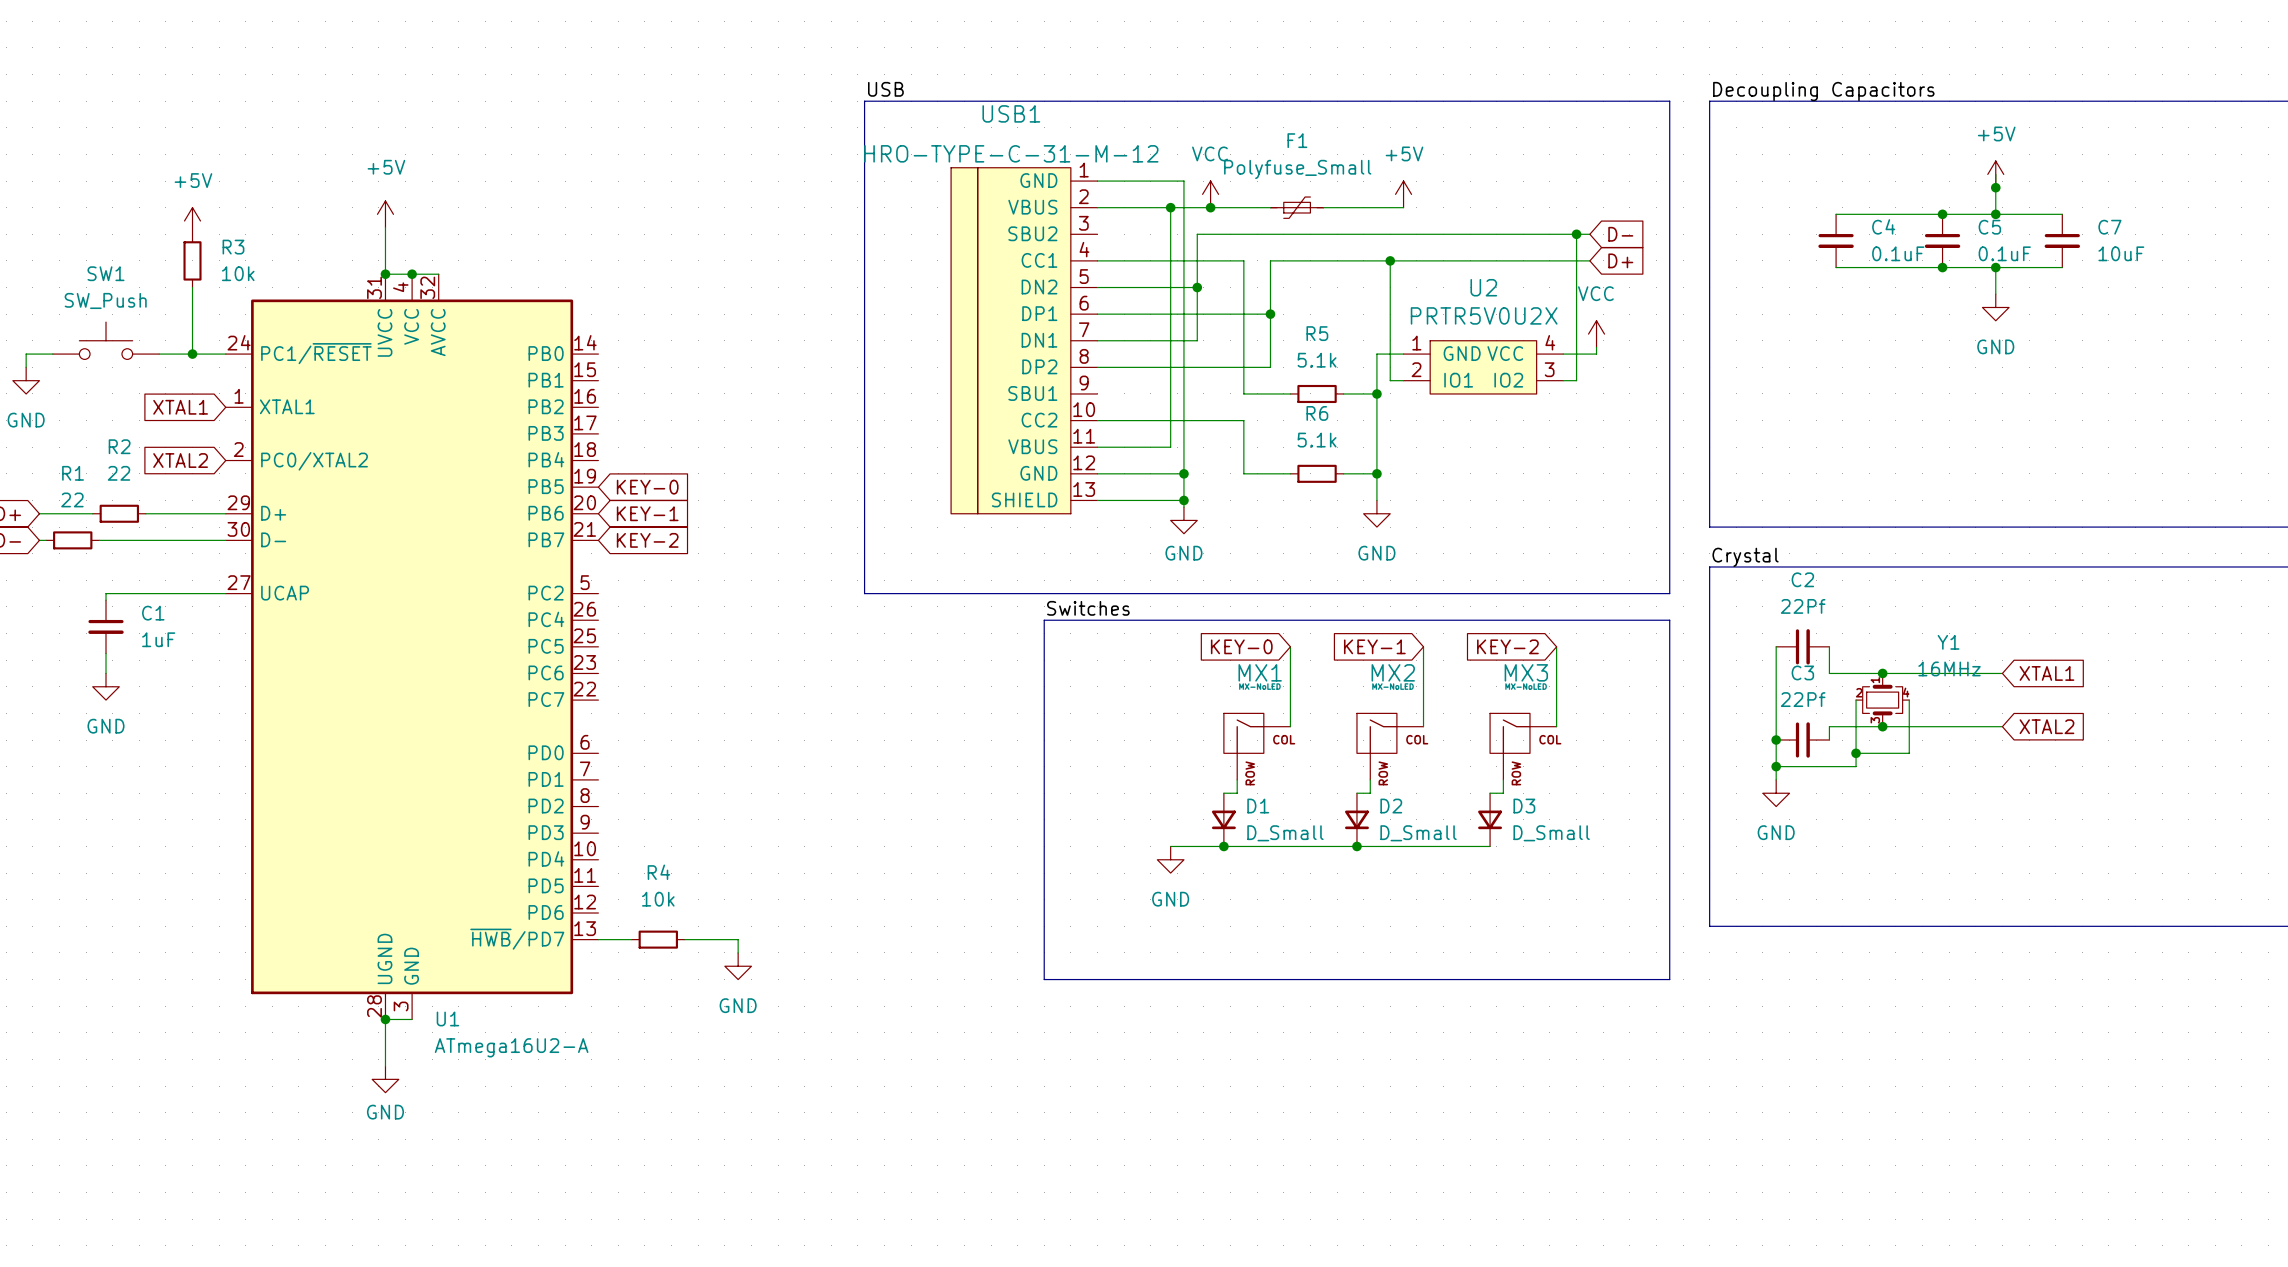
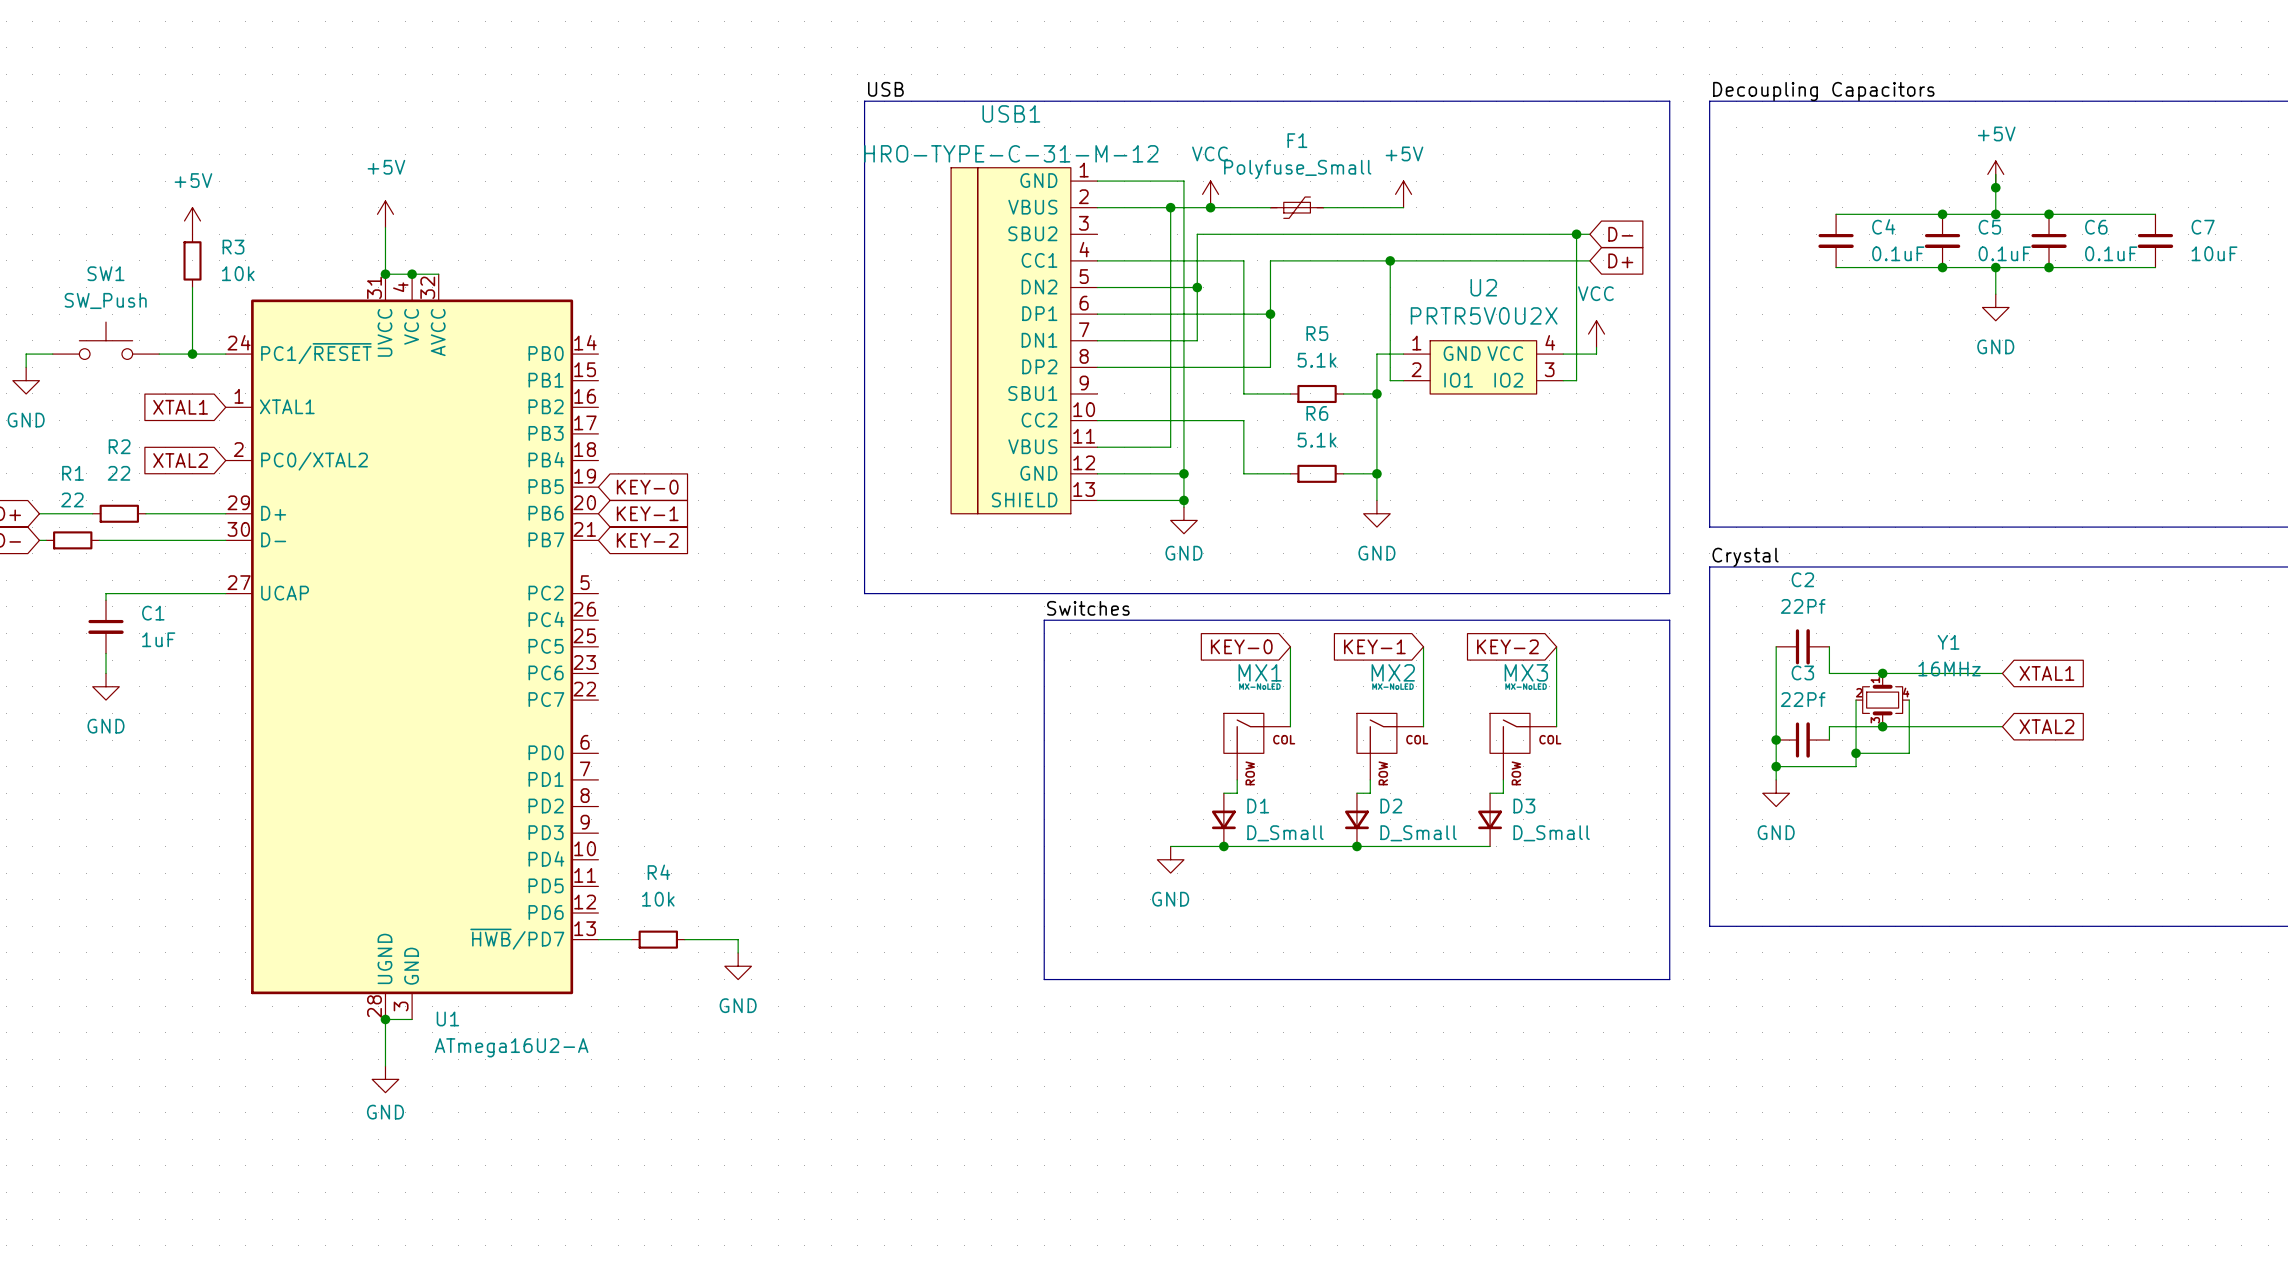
junction: none -> (2049, 214)
wire: none -> (2062, 214) (2155, 214)
C6: none -> 0.1uF (2049, 240)
C7 position: (2062, 240) -> (2155, 240)
junction: none -> (2049, 267)
wire: none -> (2062, 267) (2155, 267)

